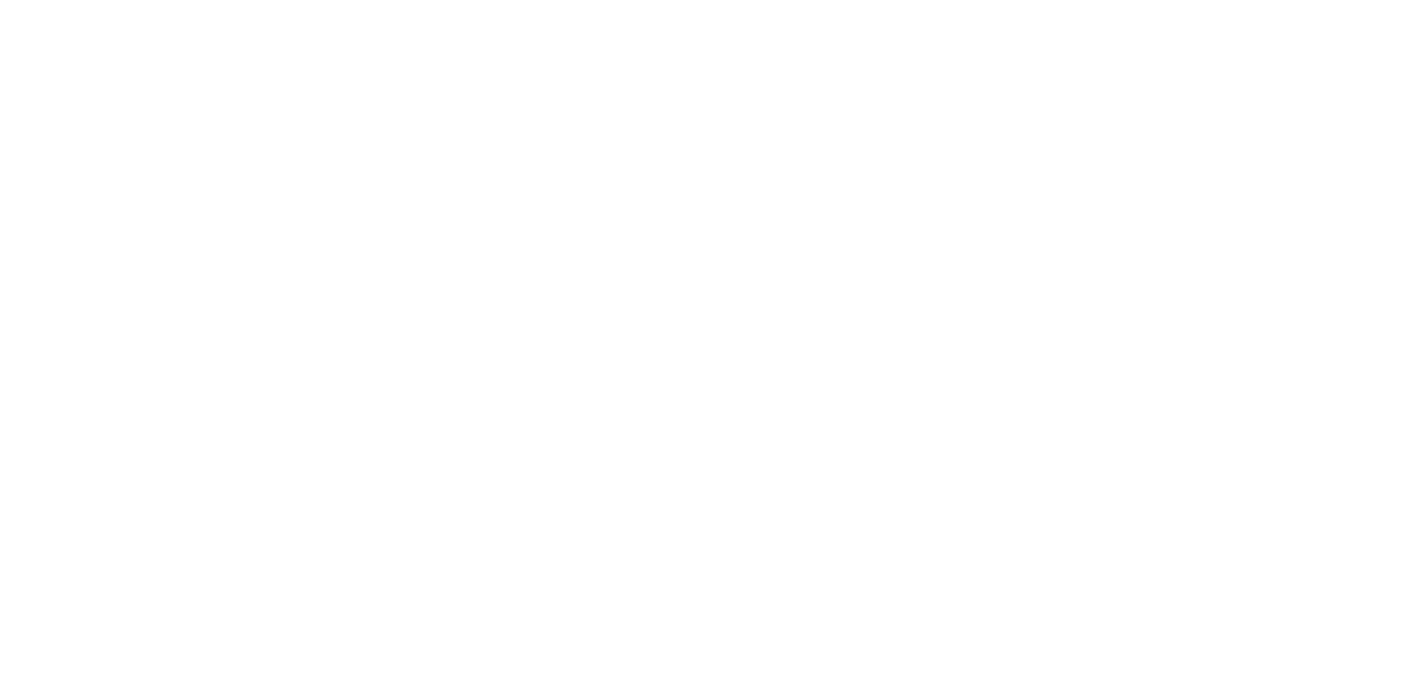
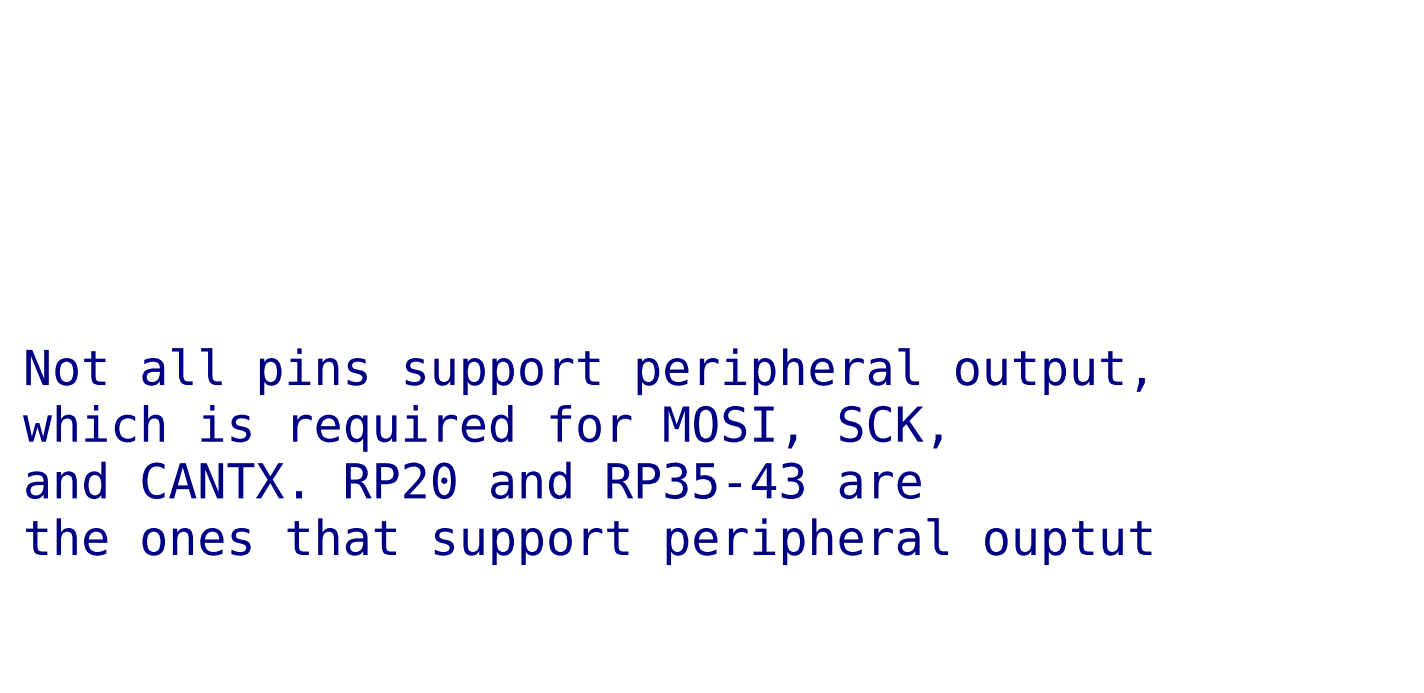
text: none -> Not all pins support peripheral output, (585, 371)
text: none -> which is required for MOSI, SCK, (482, 428)
text: none -> and CANTX. RP20 and RP35-43 are (473, 480)
text: none -> the ones that support peripheral ouptut (588, 541)

